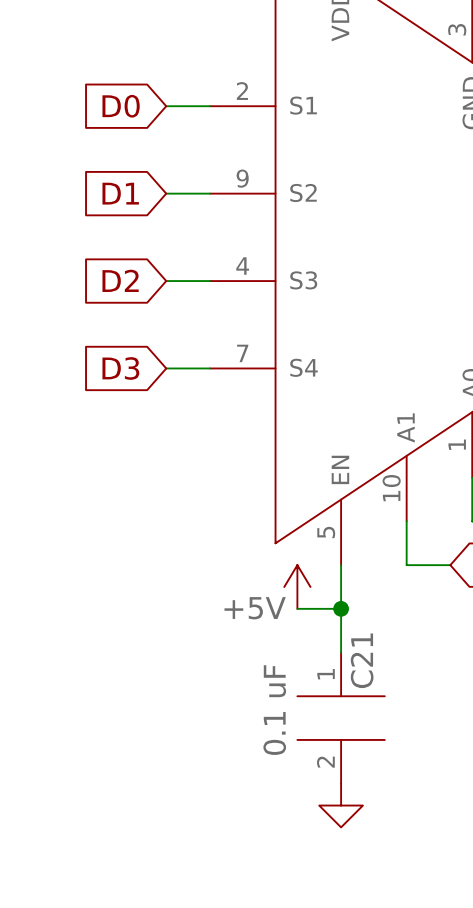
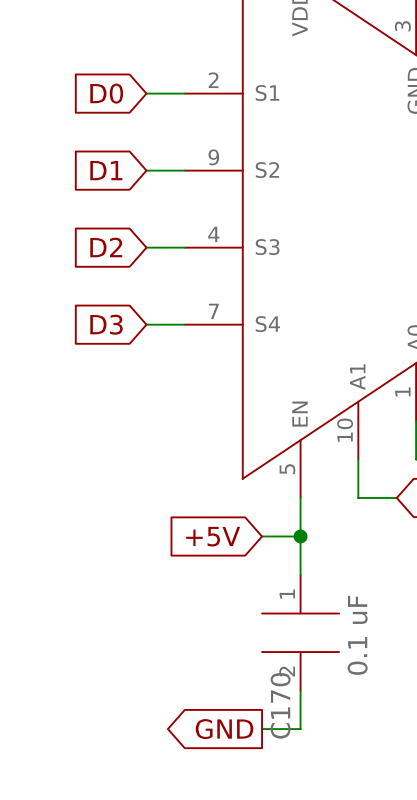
power symbol: +5V (297, 587) -> none
global label: none -> +5V (213, 536)
C21 name: C21 (362, 660) -> C170 (280, 705)
C21 value position: 0.1 uF (274, 710) -> 0.1 uF (357, 635)
wire: none -> (300, 690) (300, 729) (262, 729)
power symbol: (341, 805) -> none
global label: none -> GND (224, 729)

